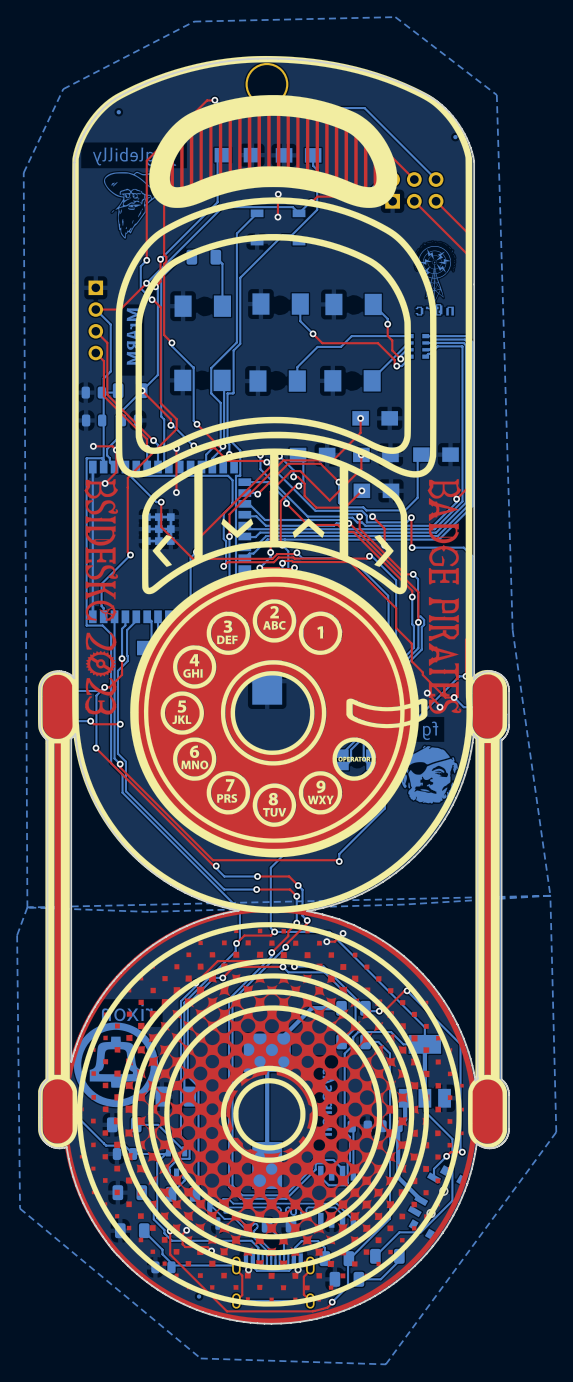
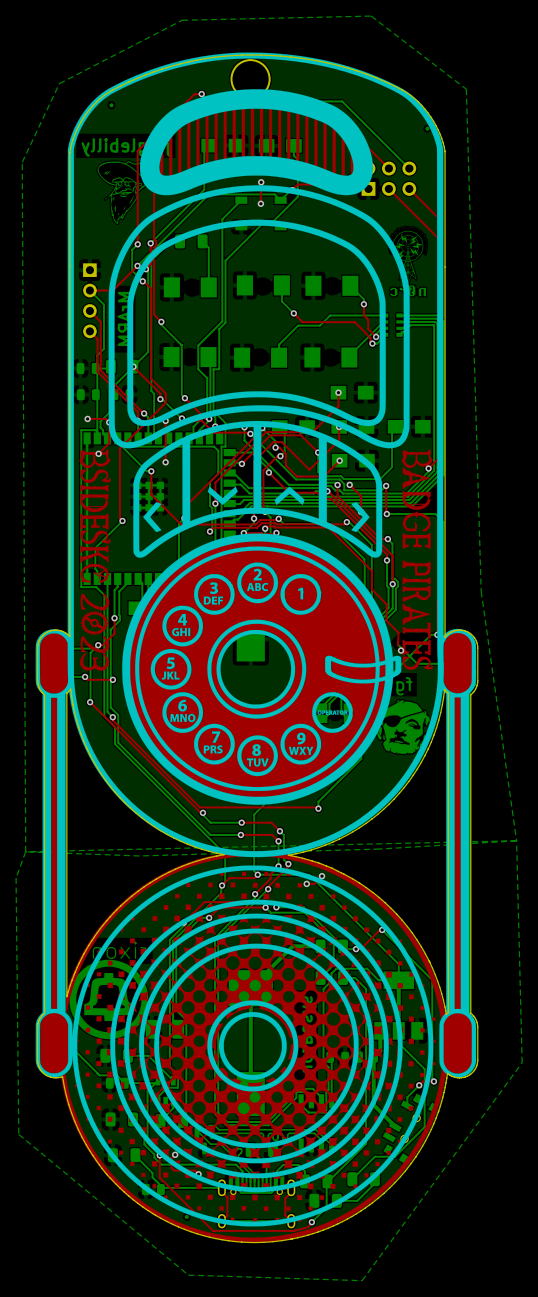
top track: (422, 672) (422, 674) (445, 697) (454, 697) -> (396, 631) (398, 632) (397, 645)
top track: (427, 693) (440, 707) -> none
bottom track: (454, 697) (463, 707) -> (398, 645) (417, 663) (435, 663)
via: (454, 697) -> none
via: (440, 707) -> none

